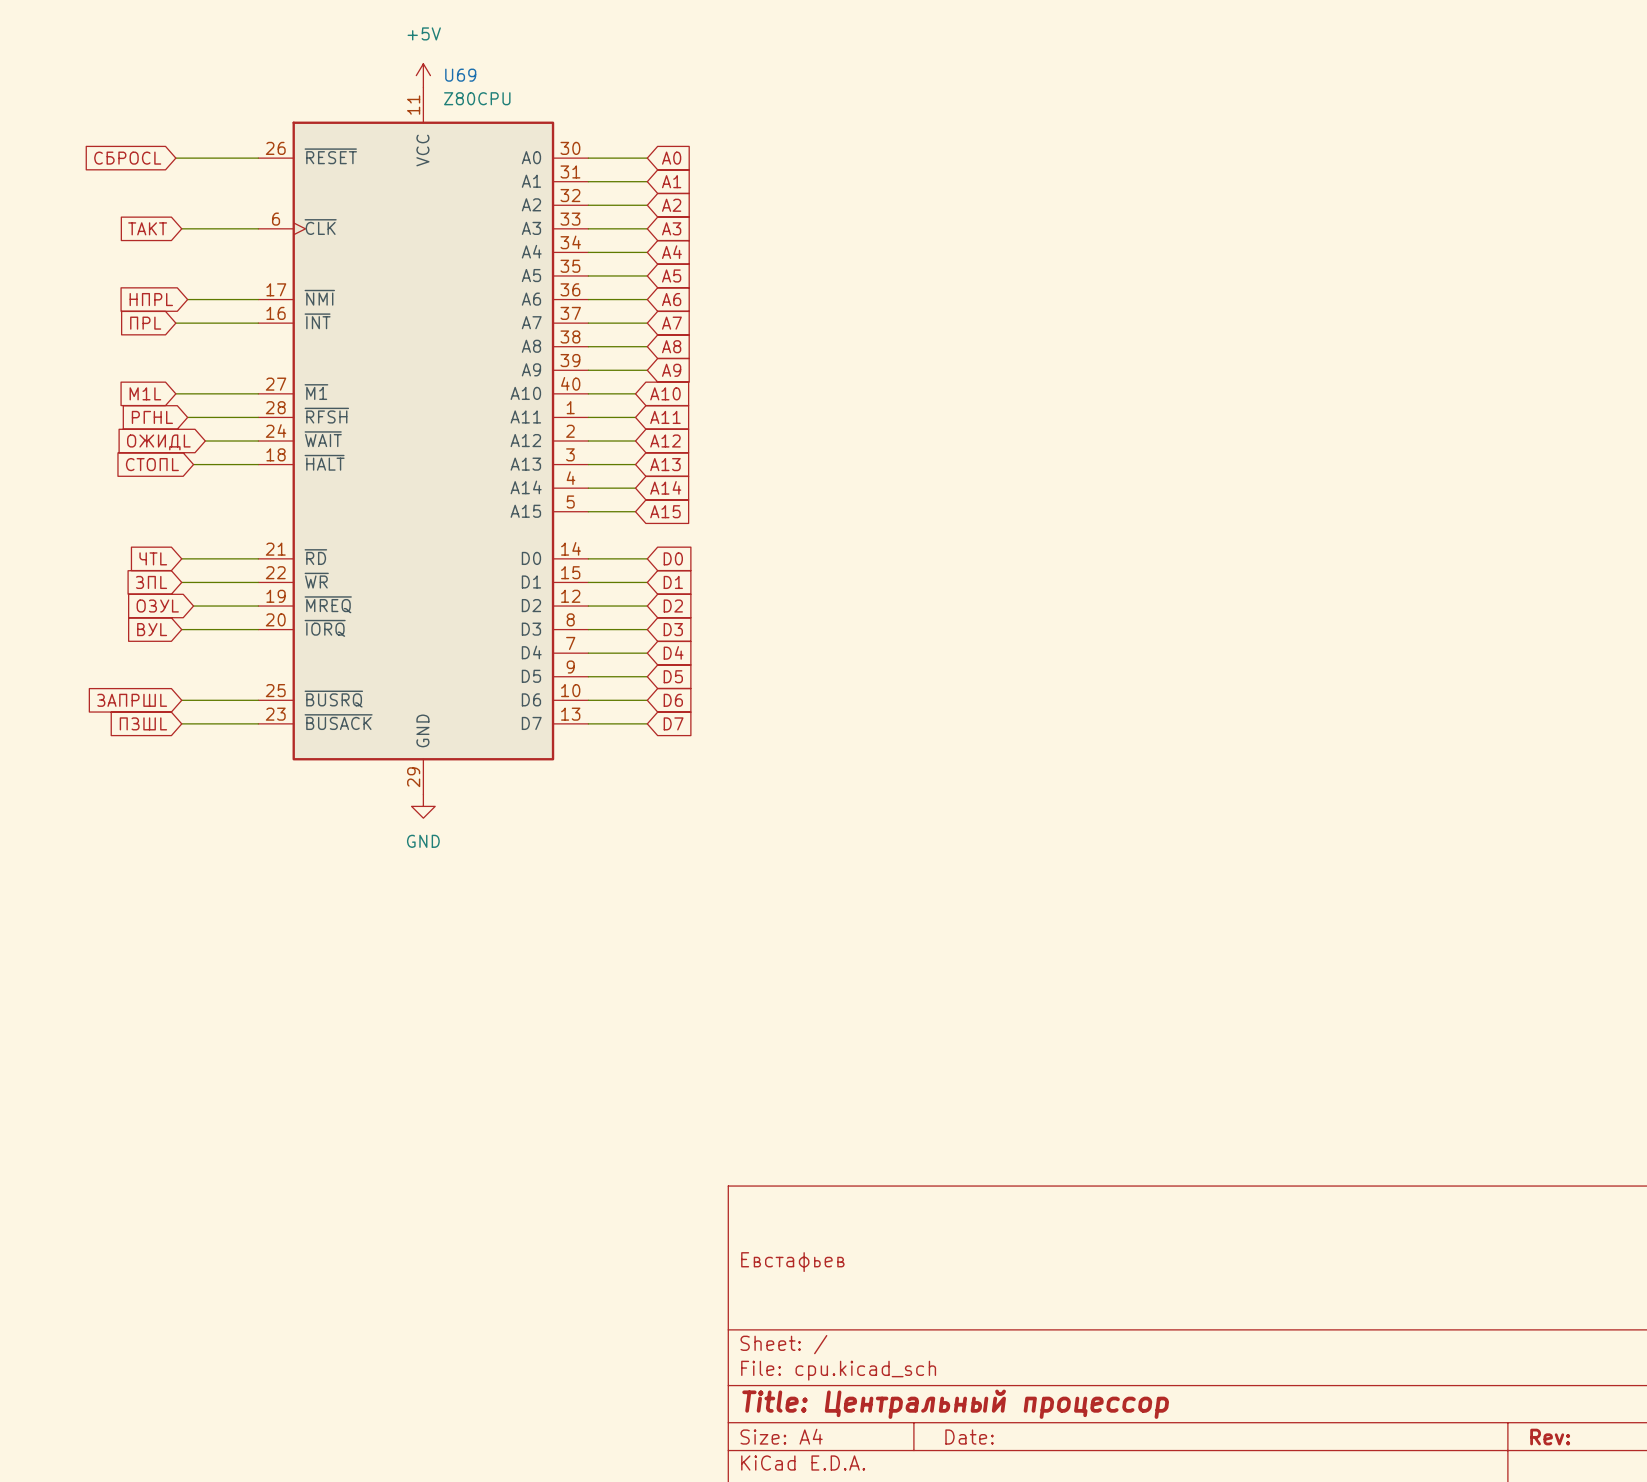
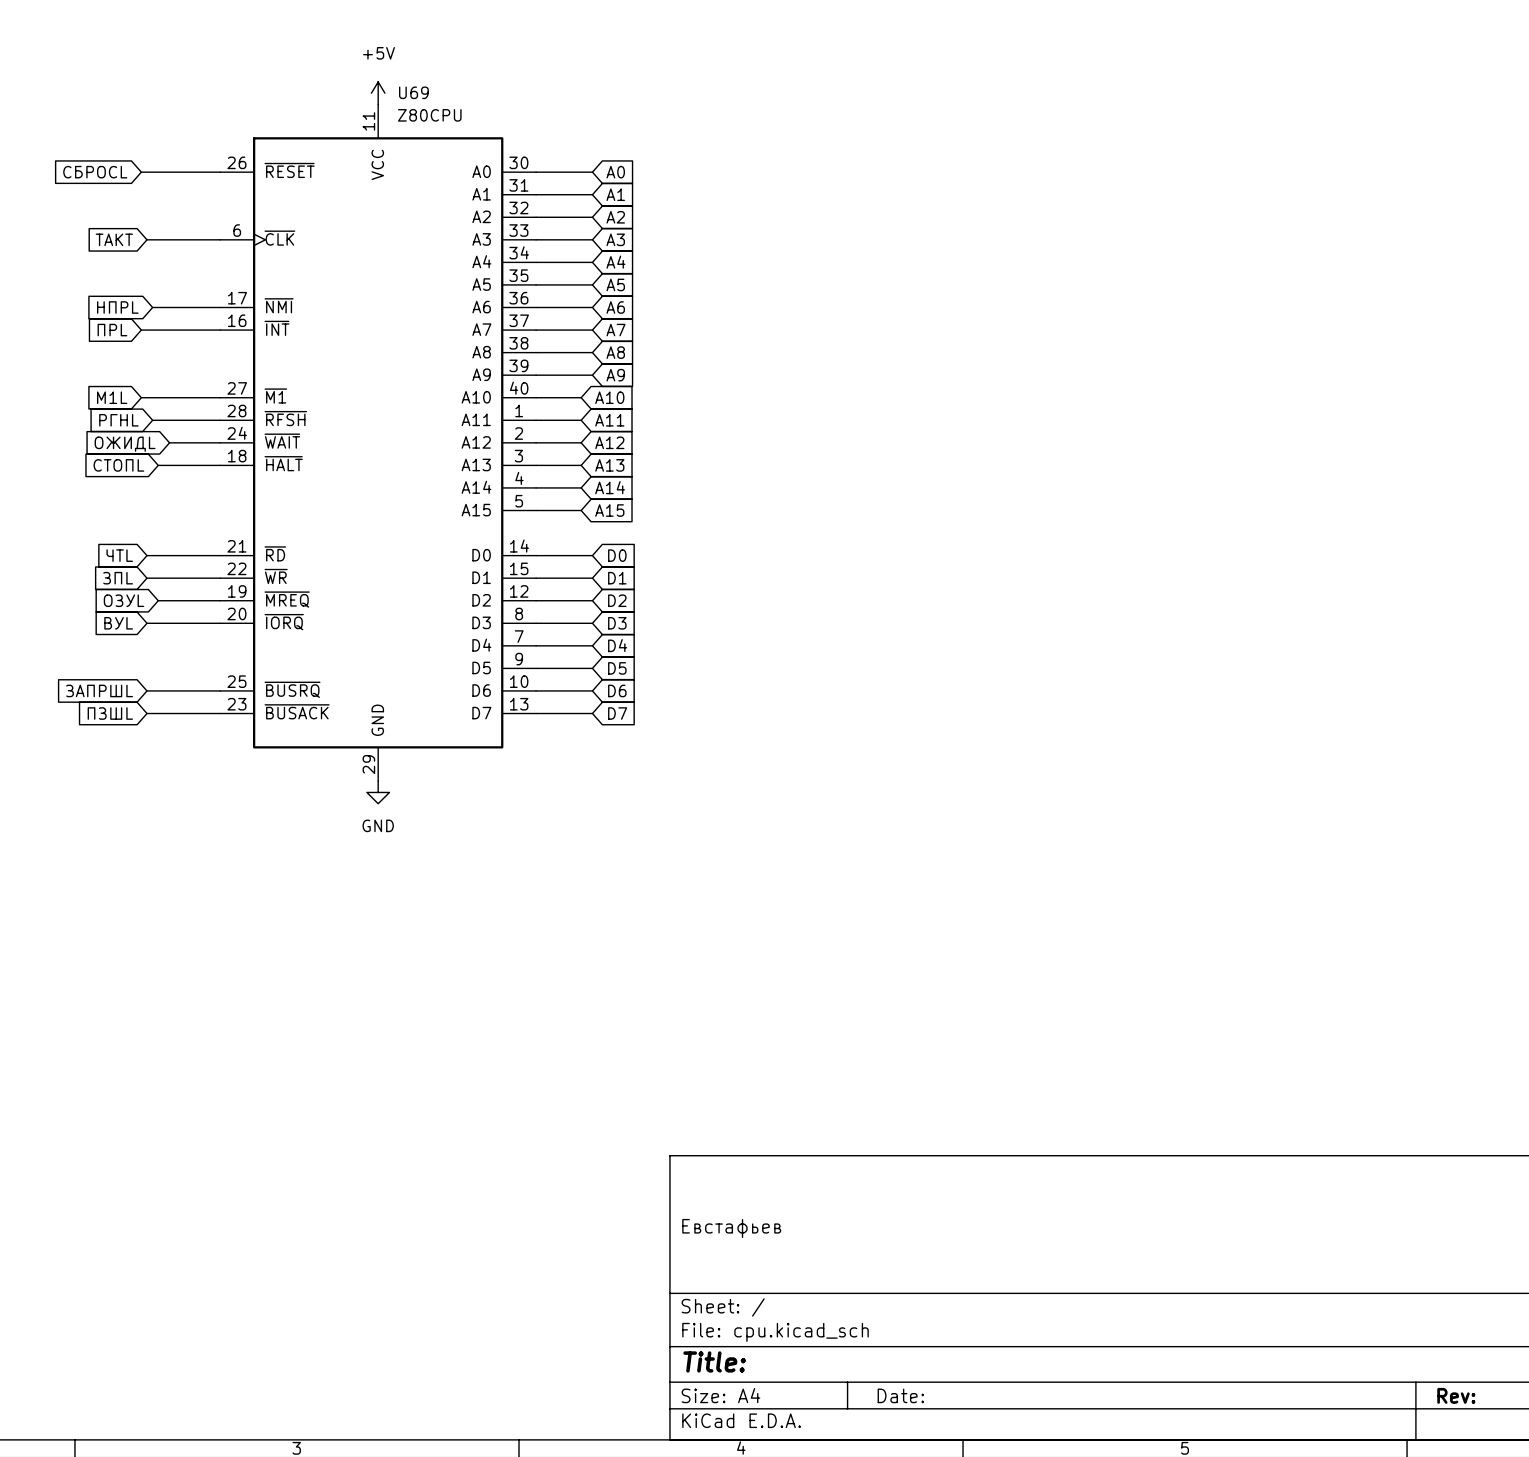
title block: Title: Центральный процессор (955, 1404) -> Title: (714, 1361)

